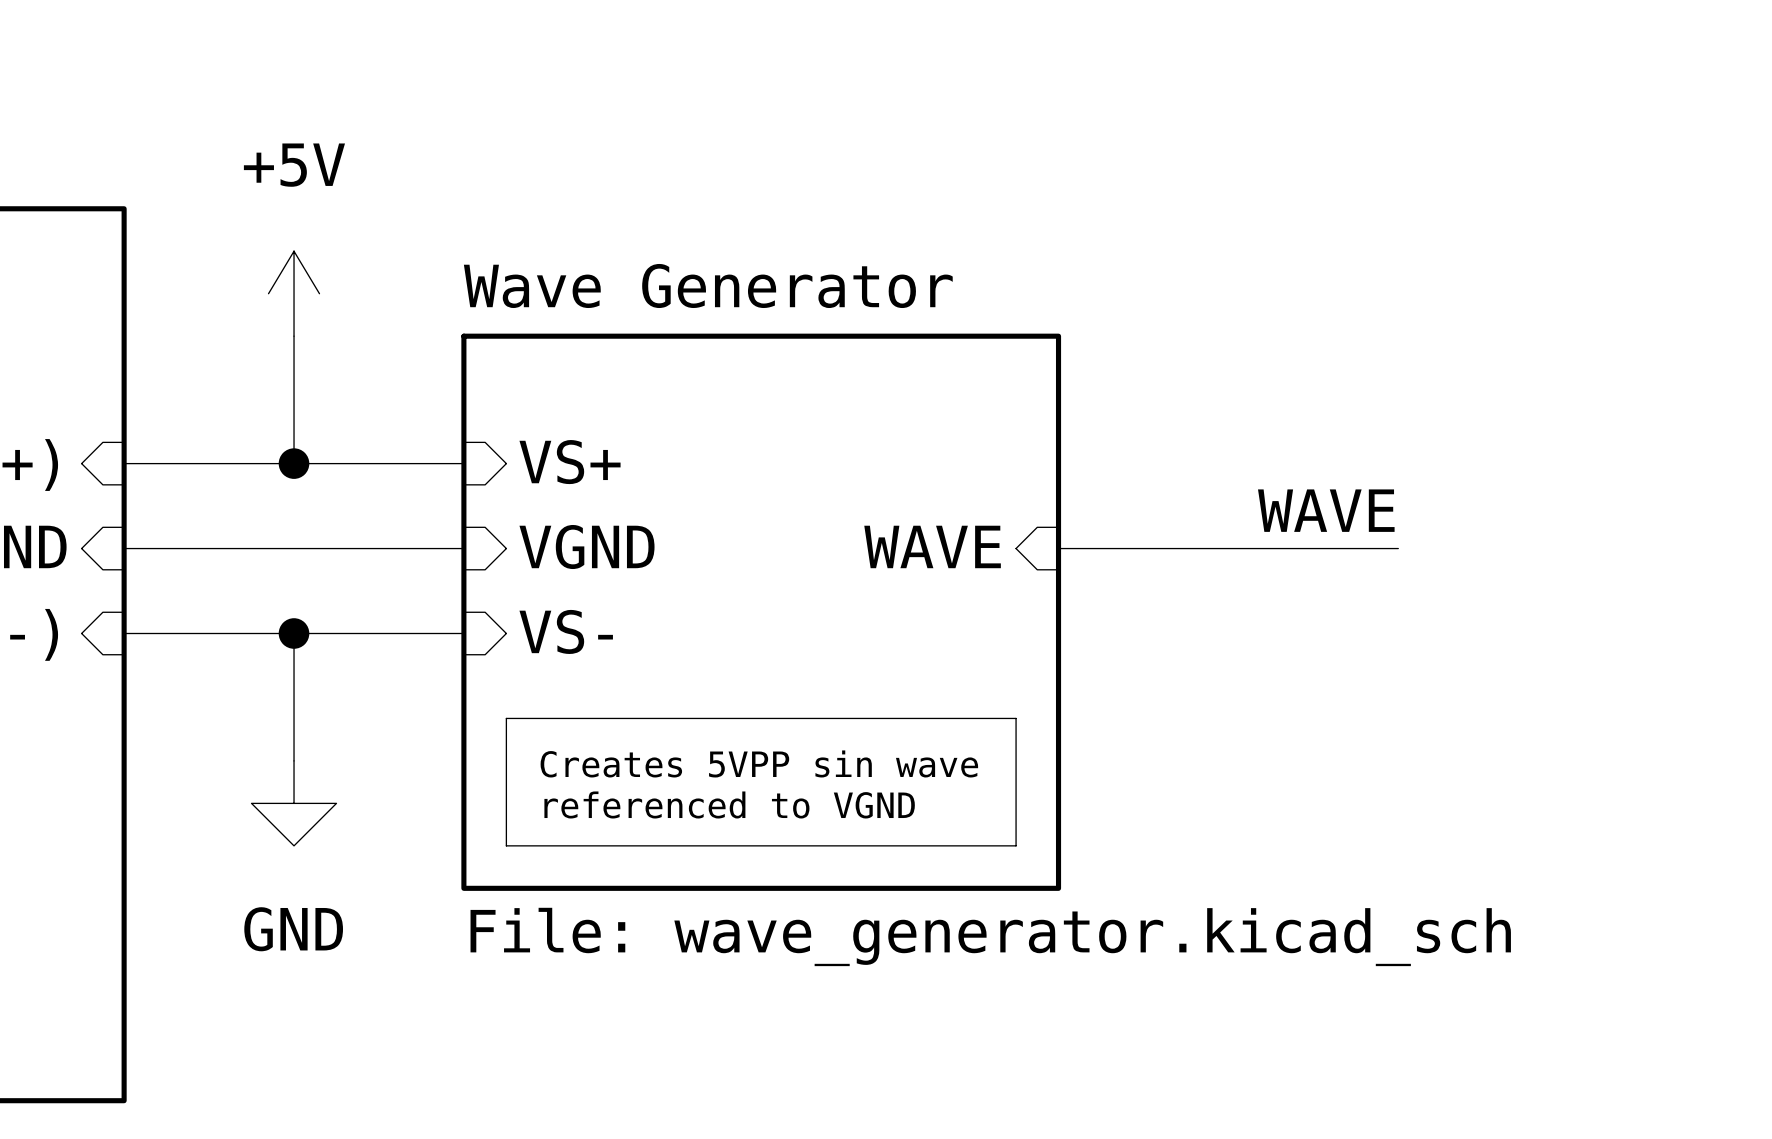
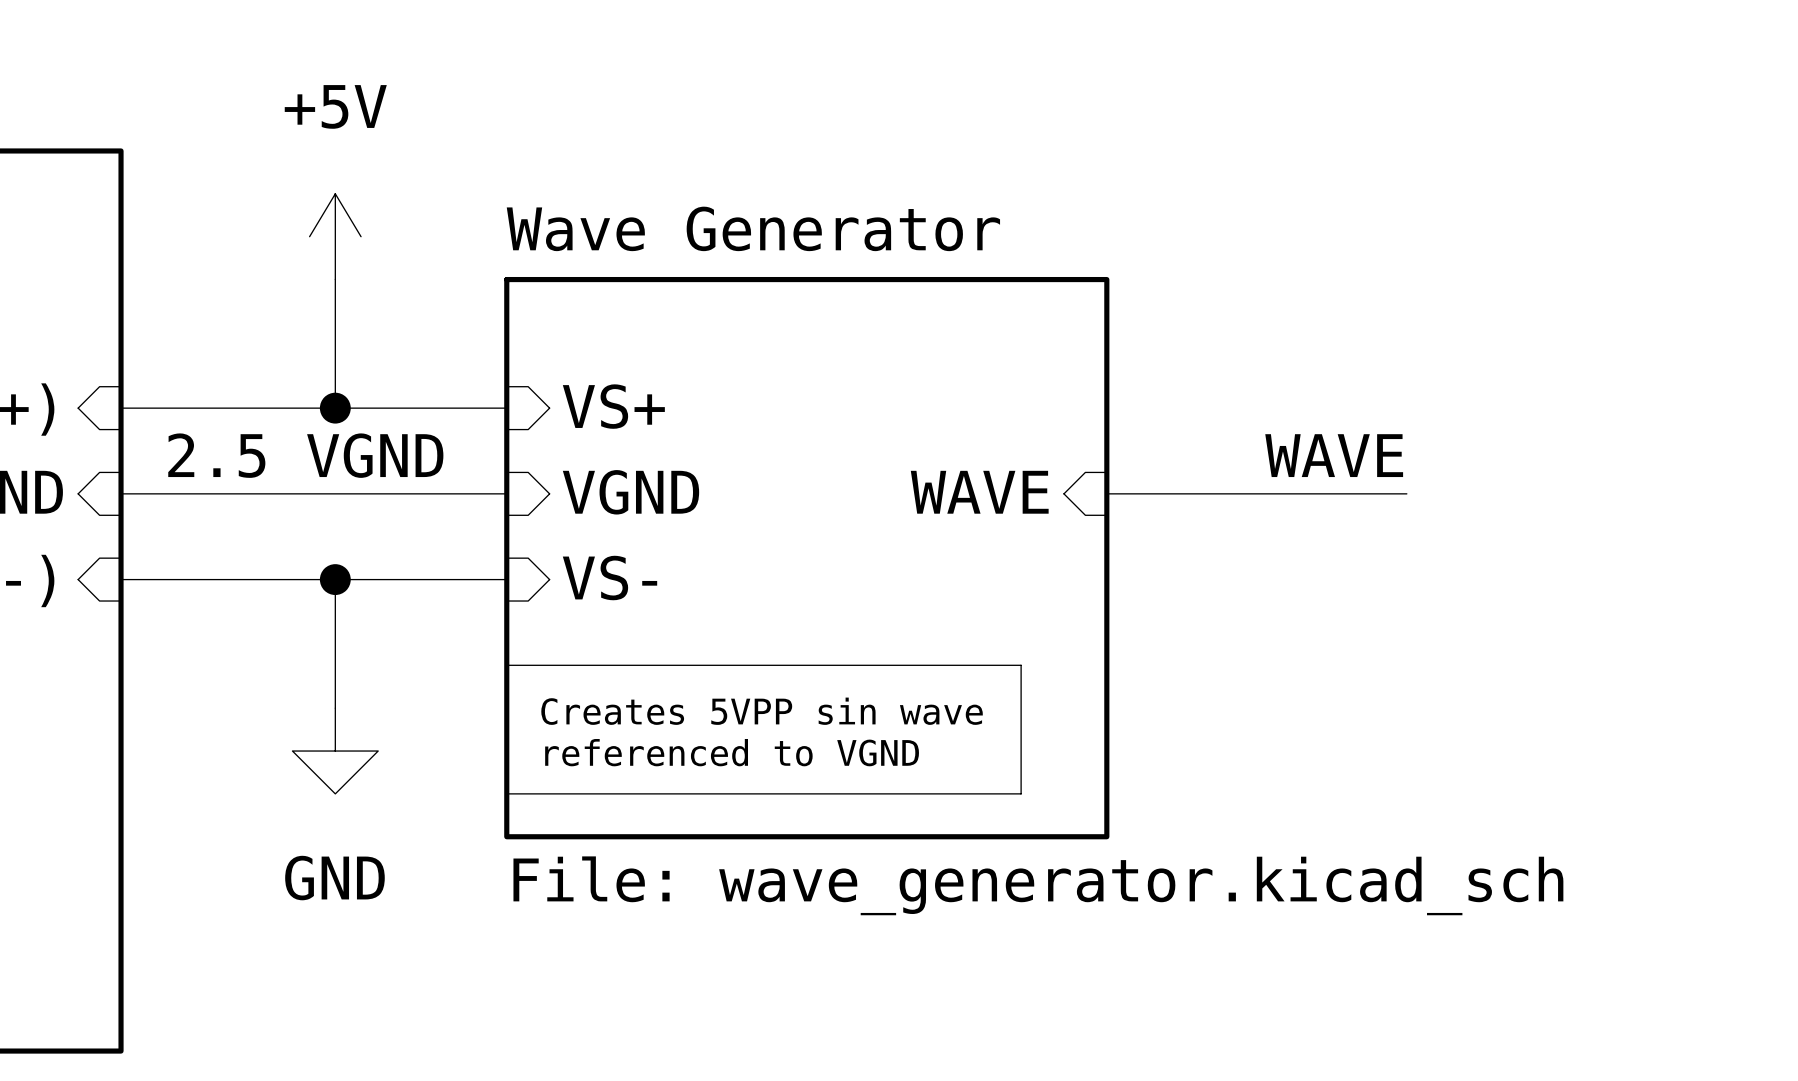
power symbol position: +5V (294, 293) -> +5V (335, 236)
wire: (294, 336) (294, 463) -> (335, 279) (335, 408)
sheet pin position: VS+ (570, 462) -> VS+ (613, 406)
junction position: (294, 463) -> (335, 408)
wire: none -> (463, 408) (506, 408)
label: none -> 2.5 VGND (305, 455)
sheet pin position: WAVE (932, 546) -> WAVE (979, 492)
sheet pin position: VGND (586, 547) -> VGND (630, 492)
wire: (1058, 548) (1100, 548) -> (463, 493) (506, 493)
sheet Wave Generator position: (761, 612) -> (806, 558)
sheet pin position: VS- (566, 631) -> VS- (610, 578)
wire: (294, 633) (294, 760) -> (335, 579) (335, 708)
junction position: (294, 633) -> (335, 579)
wire: none -> (463, 579) (506, 579)
power symbol position: GND (294, 803) -> GND (335, 751)

